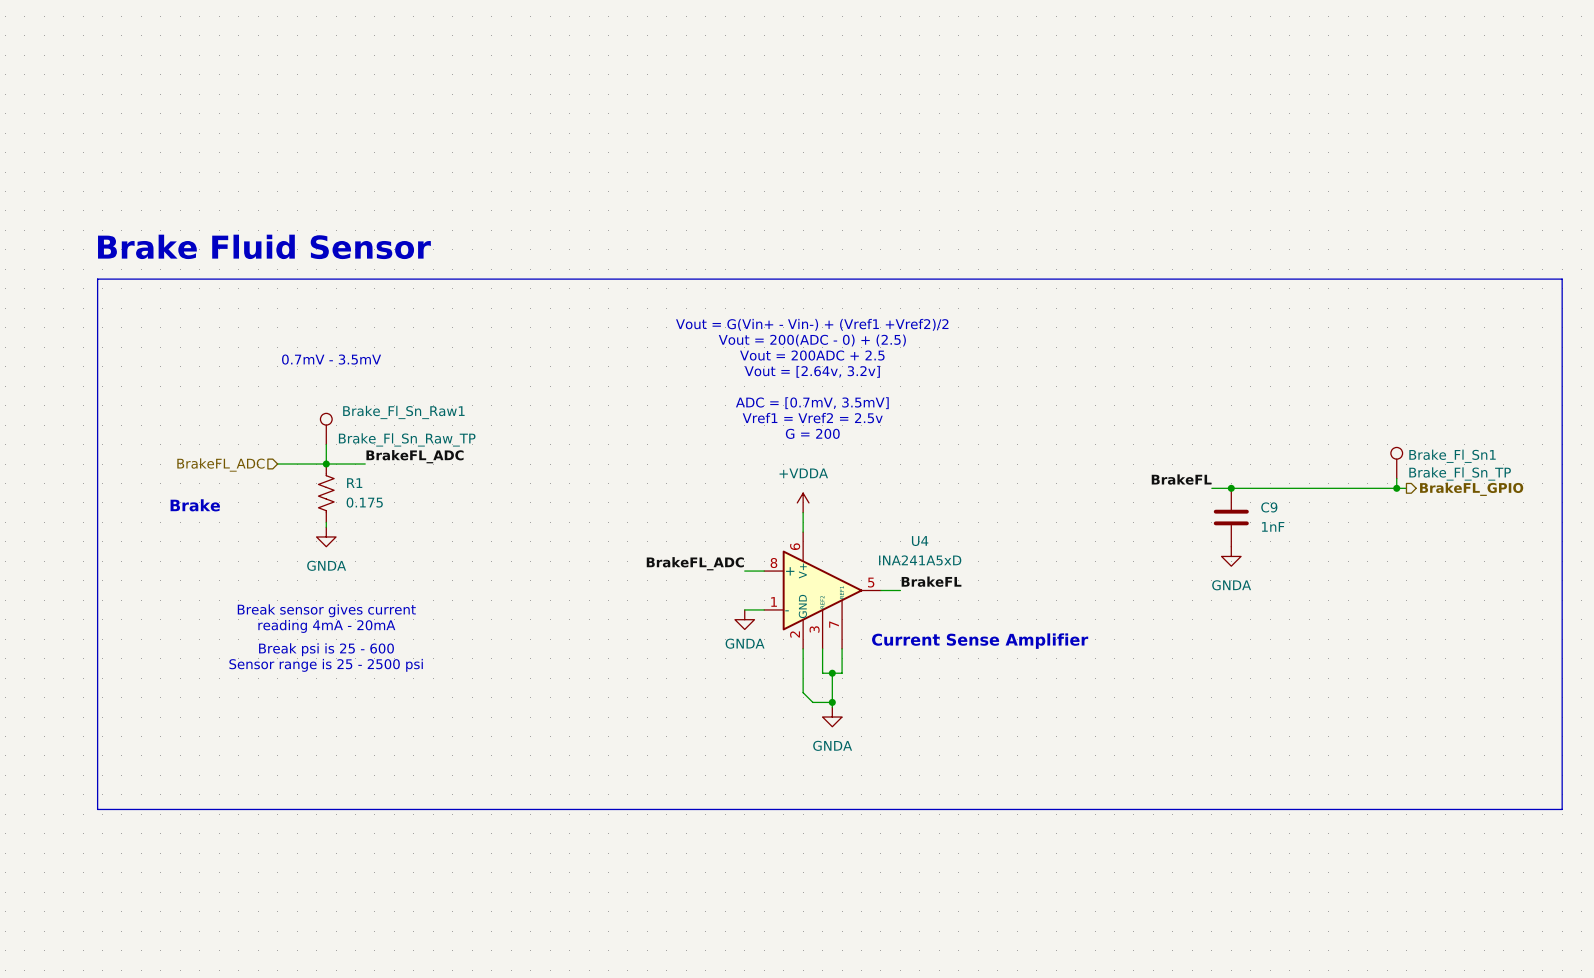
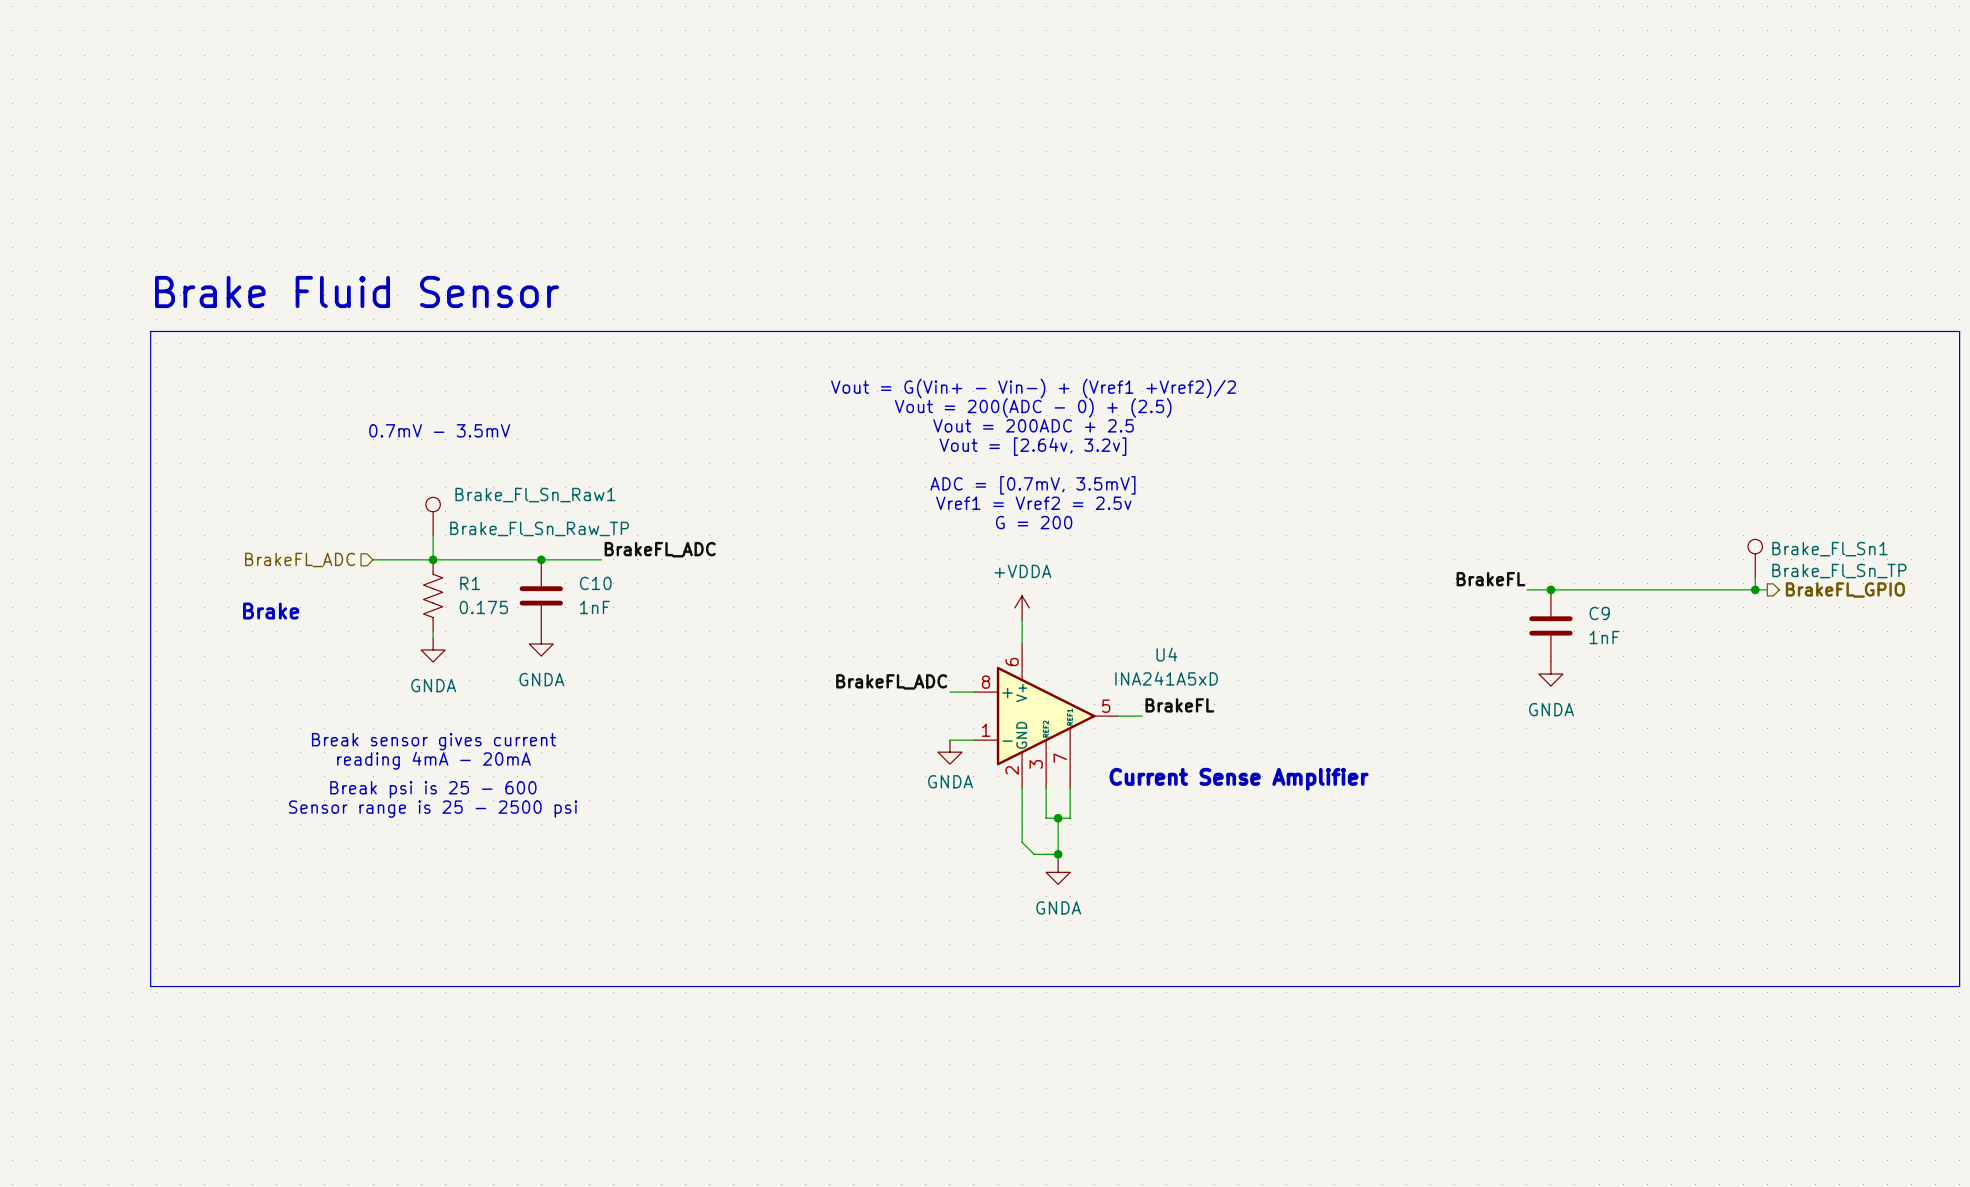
label position: BrakeFL_ADC (415, 456) -> BrakeFL_ADC (660, 549)
wire: none -> (481, 559) (601, 559)
junction: none -> (541, 559)
C10: none -> 1nF (541, 595)
power symbol: none -> GNDA (541, 643)

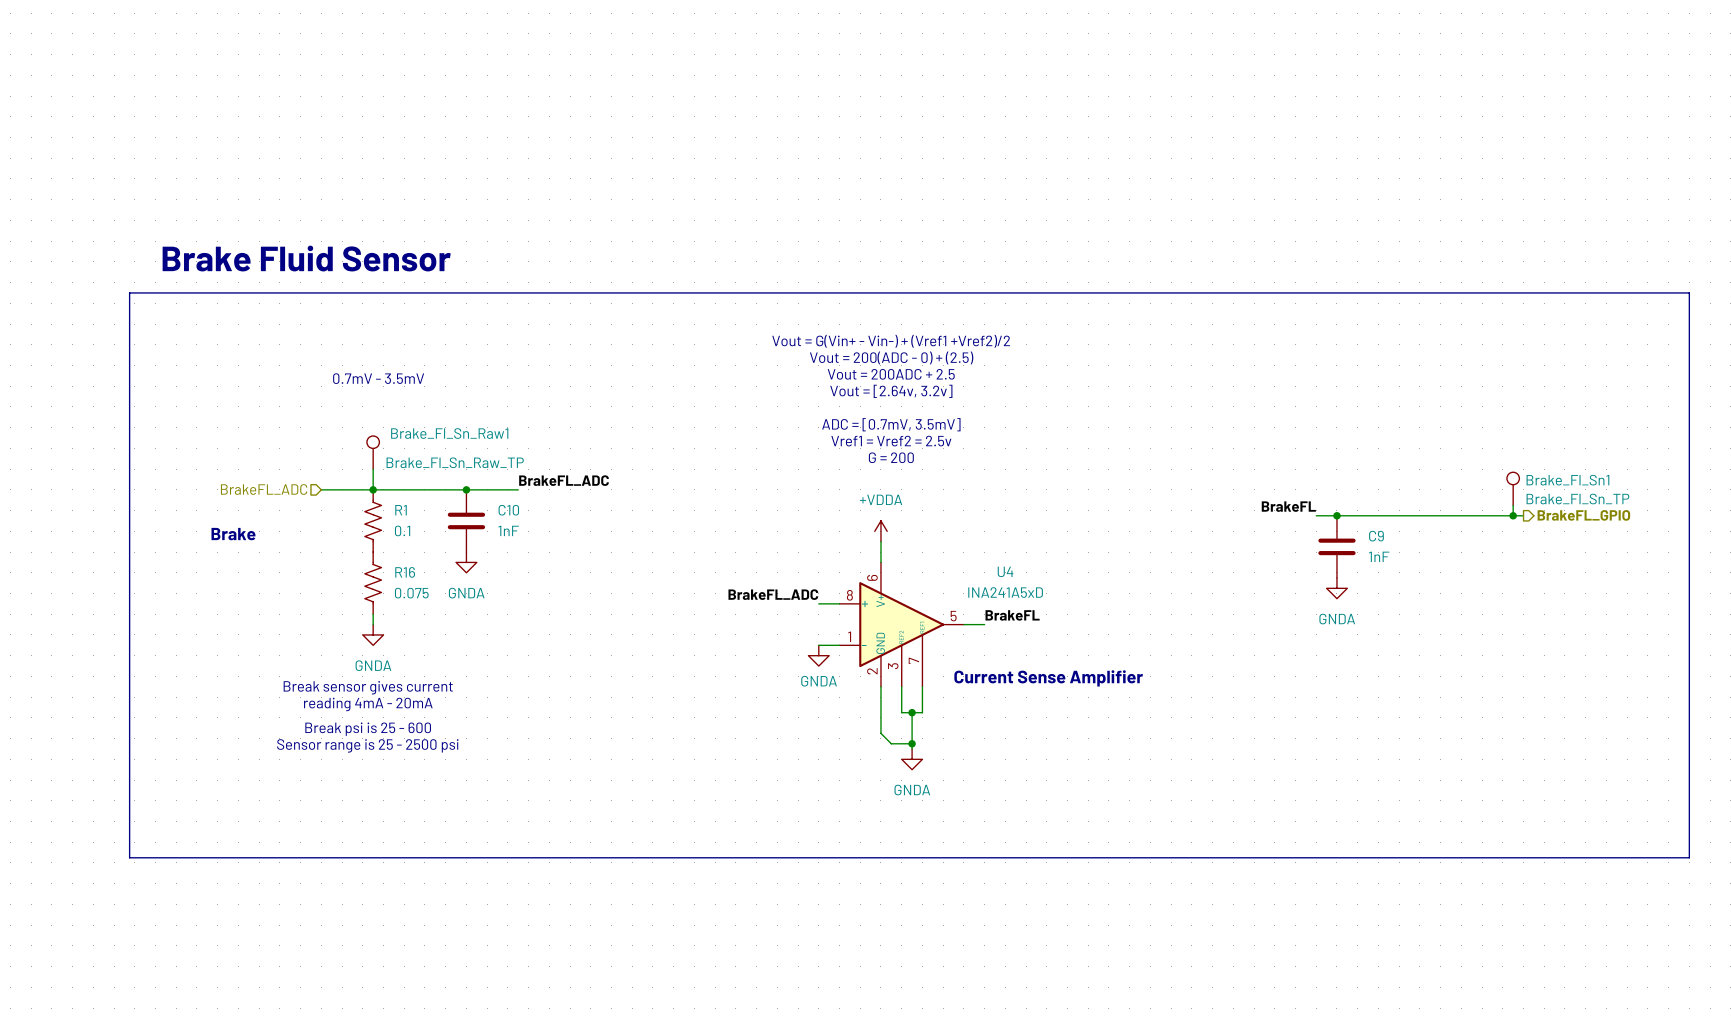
R1 value: 0.175 (483, 607) -> 0.1 (402, 530)
power symbol position: GNDA (433, 649) -> GNDA (373, 634)
R16: none -> 0.075 (373, 583)
wire: none -> (373, 614) (373, 624)
text: Break sensor gives current (433, 741) -> none
text: reading 4mA - 20mA (433, 760) -> none
text: Break psi is 25 - 600 (433, 789) -> Break sensor gives current (368, 687)
text: Sensor range is 25 - 2500 psi (433, 809) -> reading 4mA - 20mA (368, 704)
text: none -> Break psi is 25 - 600 (368, 729)
text: none -> Sensor range is 25 - 2500 psi (367, 745)

